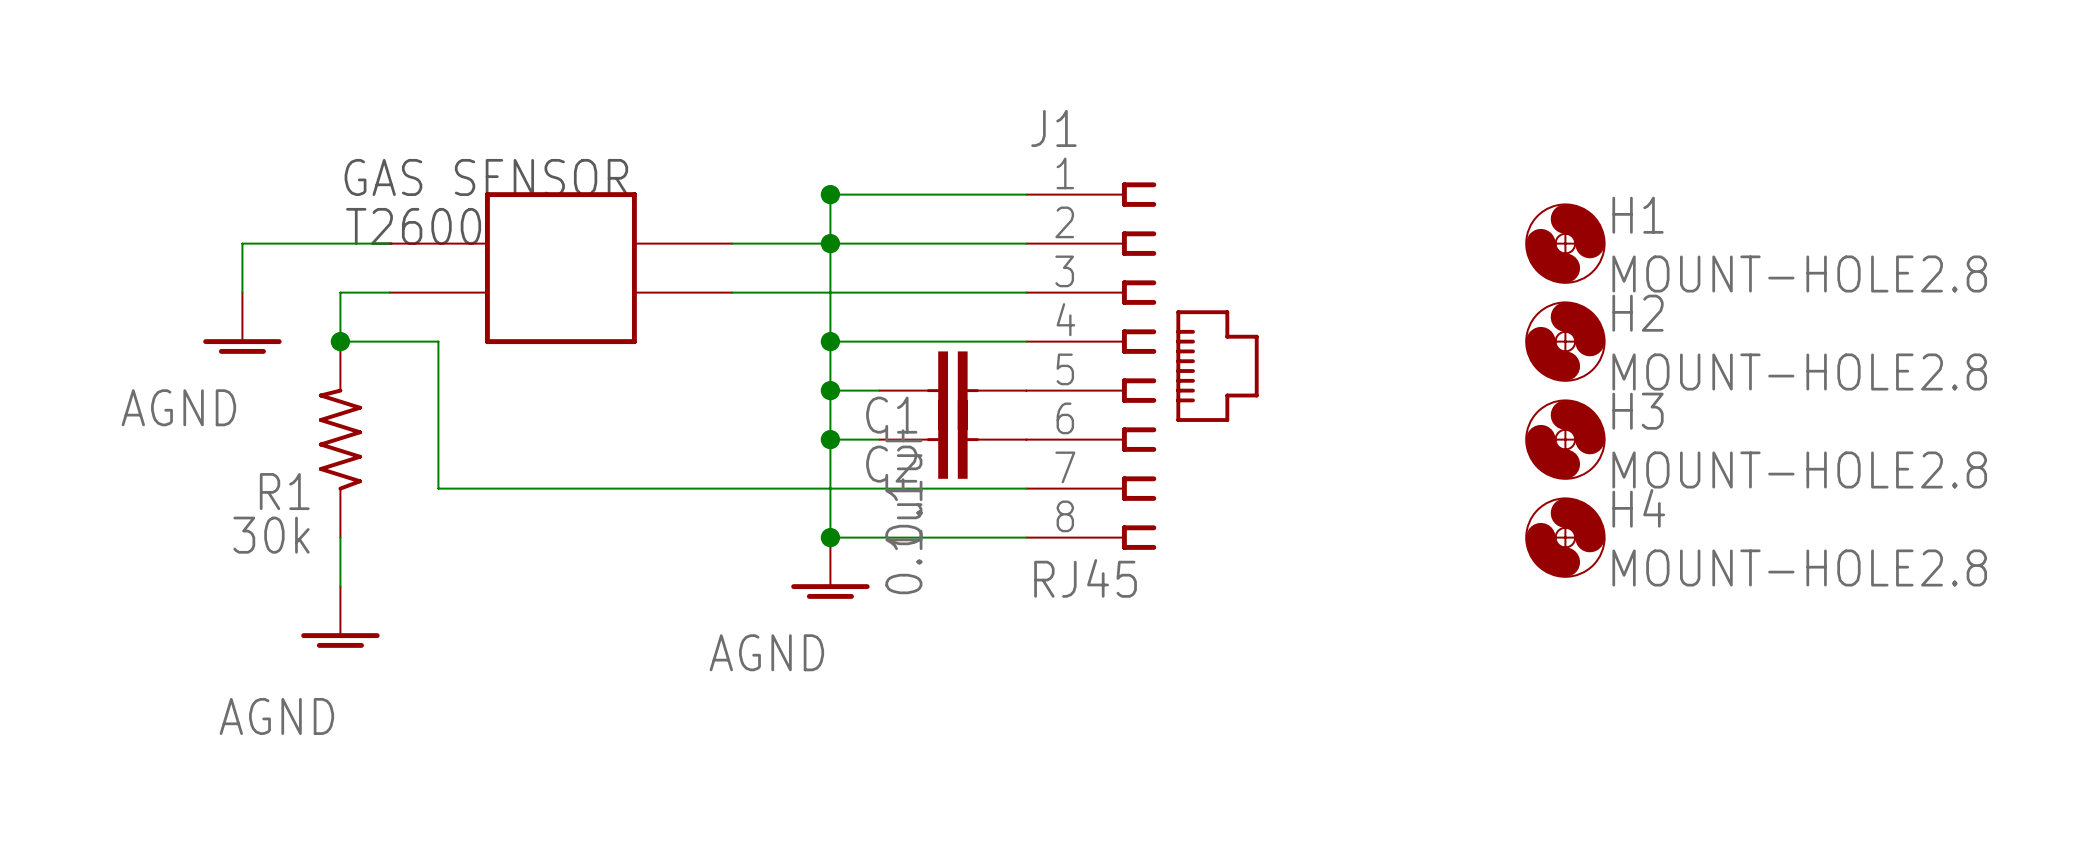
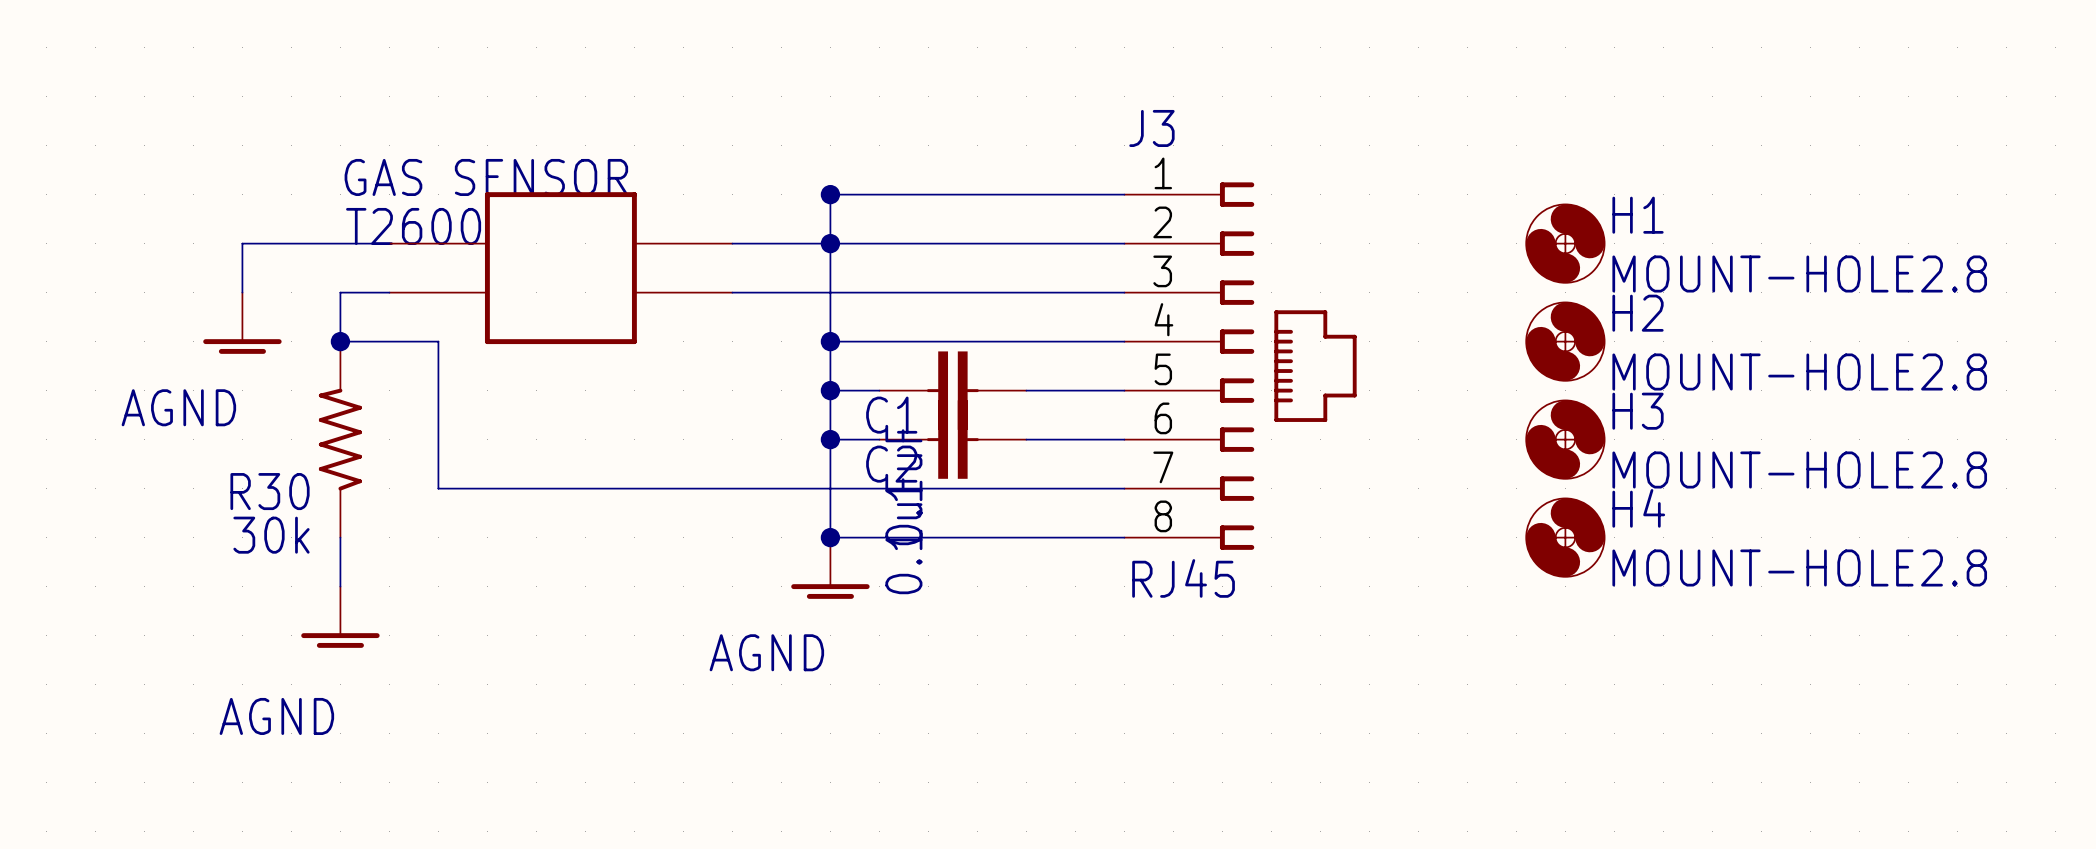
J1: RJ45 (1142, 366) -> none
J3: none -> RJ45 (1240, 366)
R1 name: R1 (284, 491) -> R30 (270, 491)

